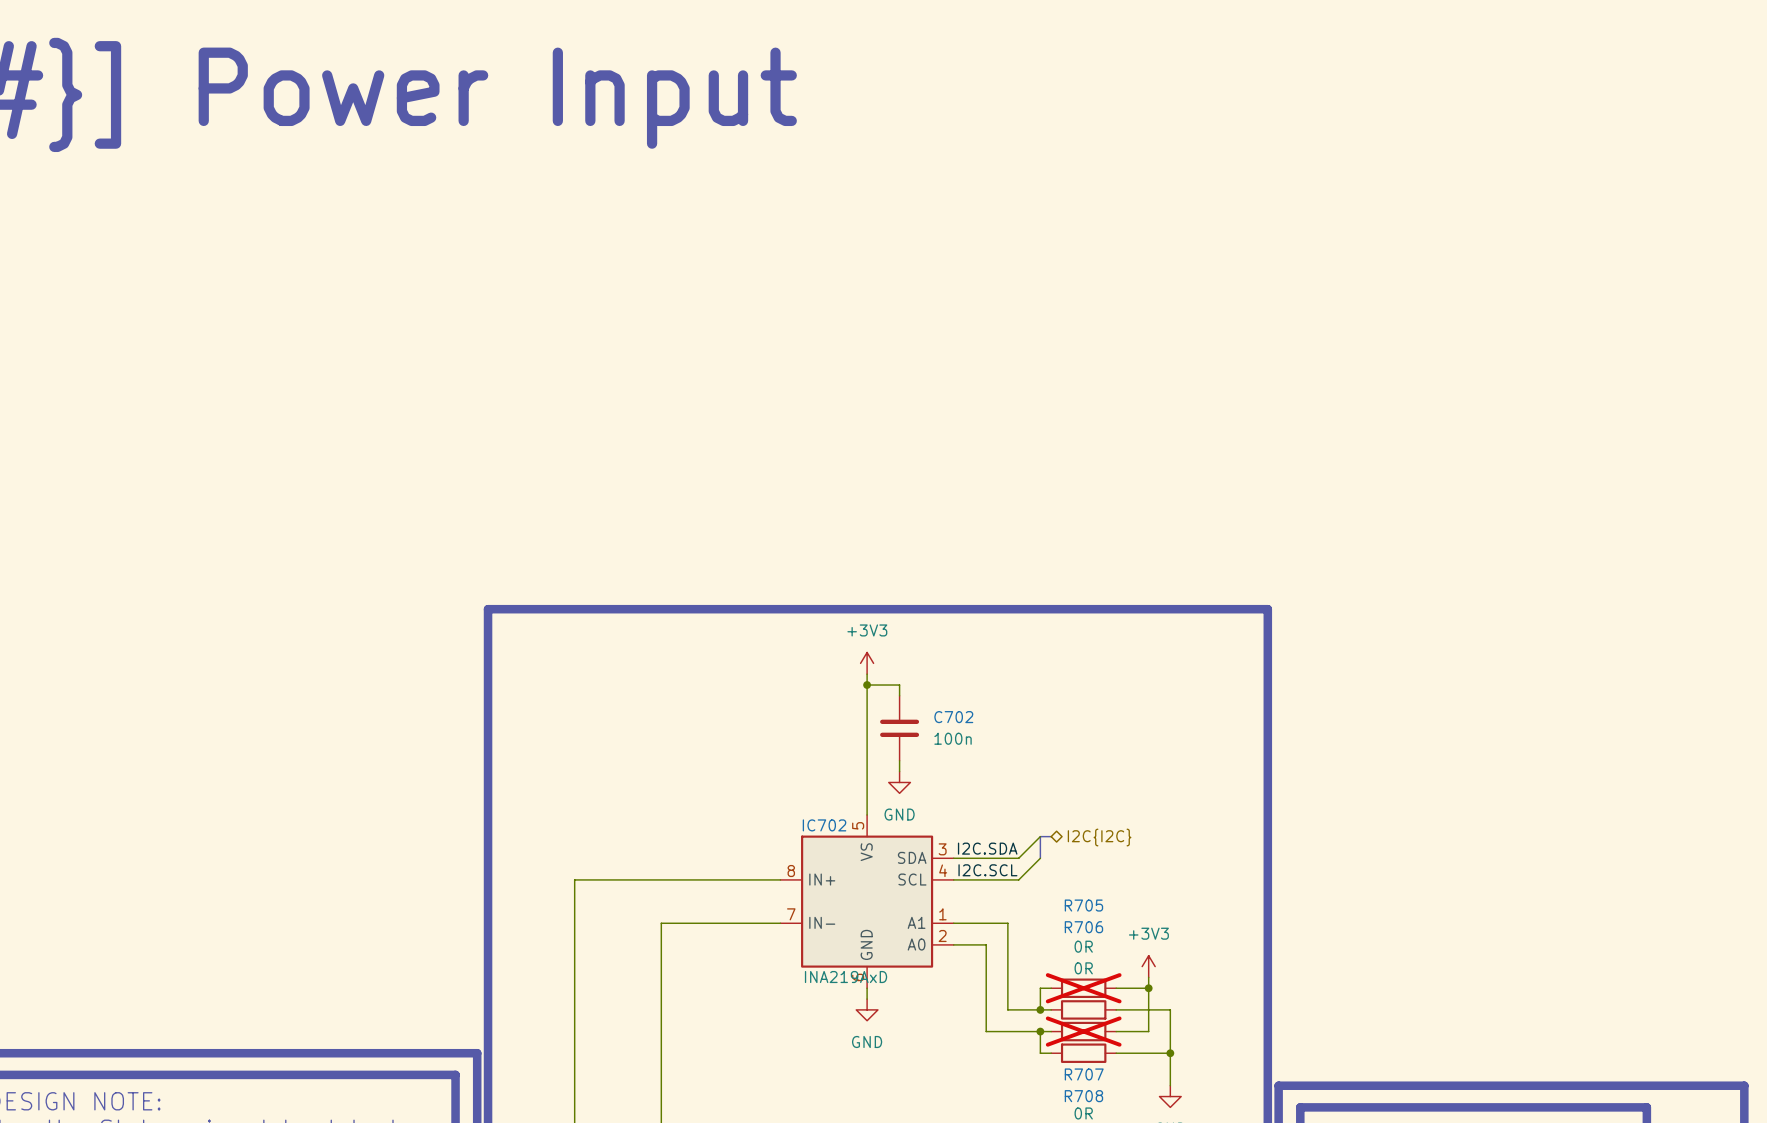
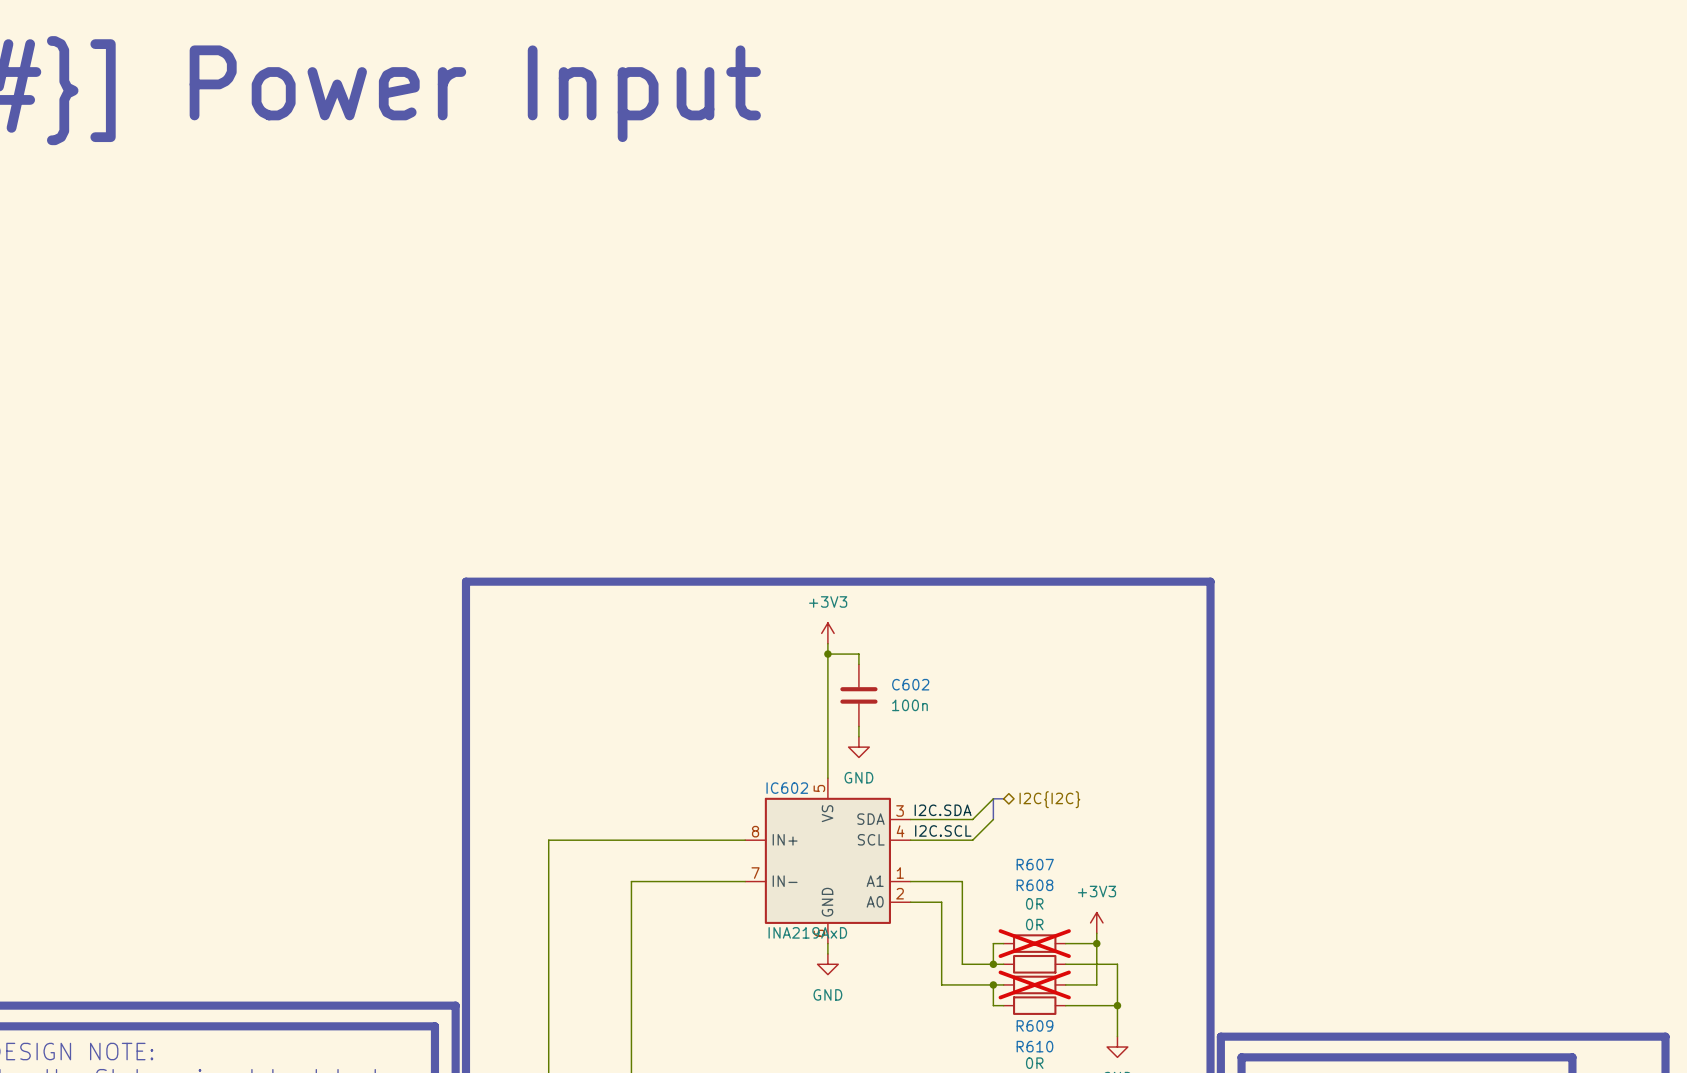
C702 name: C702 (953, 717) -> C602 (910, 684)
IC702 name: IC702 (824, 825) -> IC602 (787, 788)
R705 name: R705 (1083, 905) -> R607 (1035, 864)
R706 name: R706 (1083, 927) -> R608 (1034, 885)
R707 name: R707 (1084, 1074) -> R609 (1034, 1025)
R708 name: R708 (1083, 1096) -> R610 (1034, 1046)

